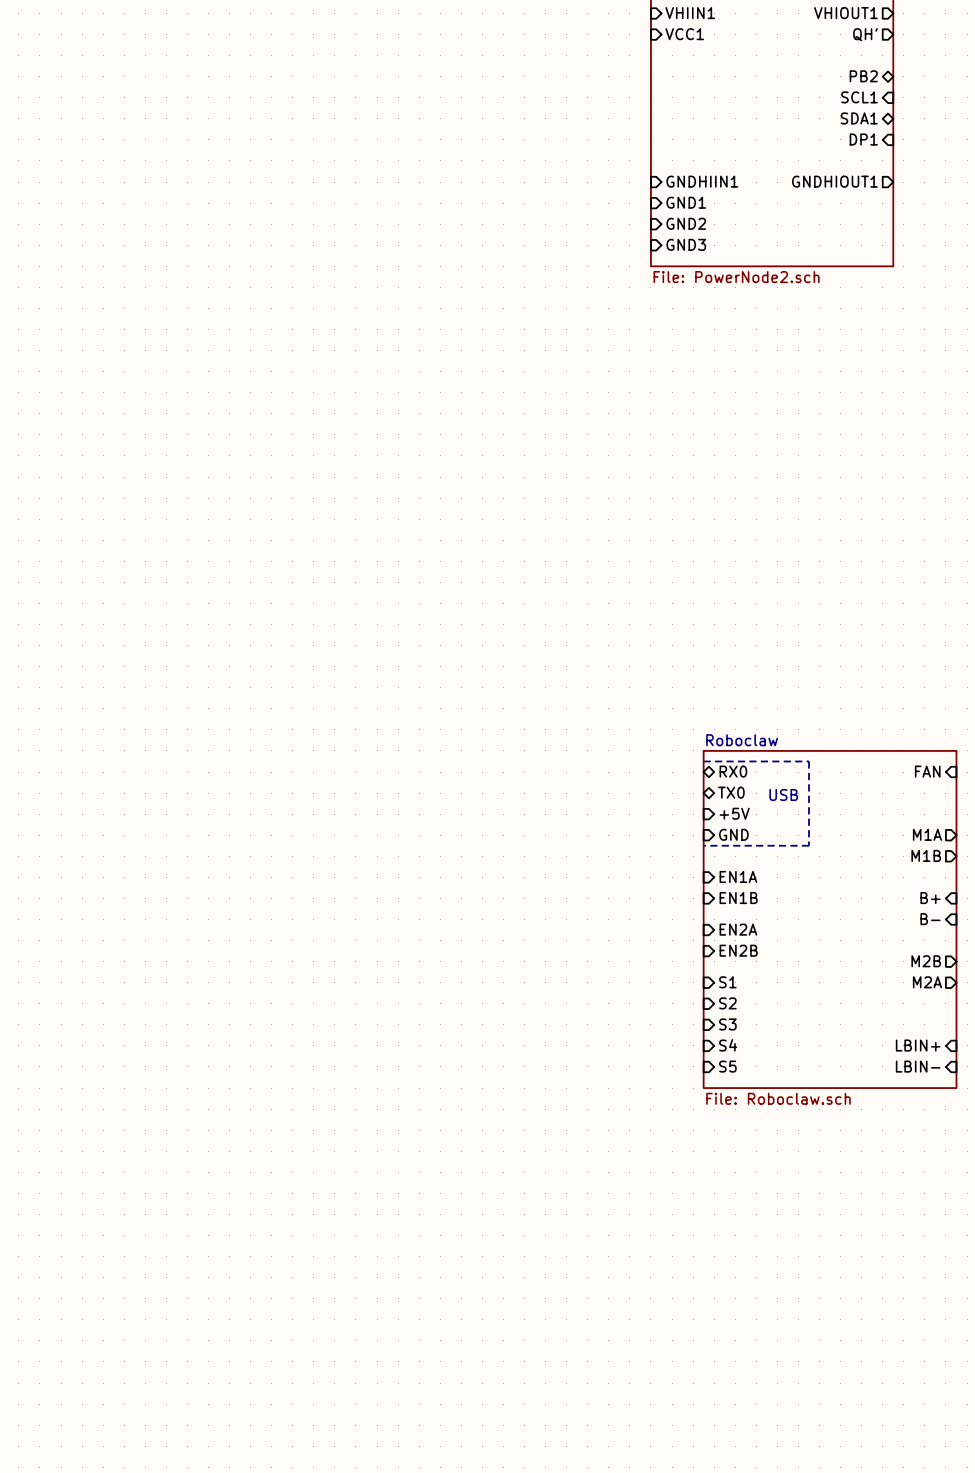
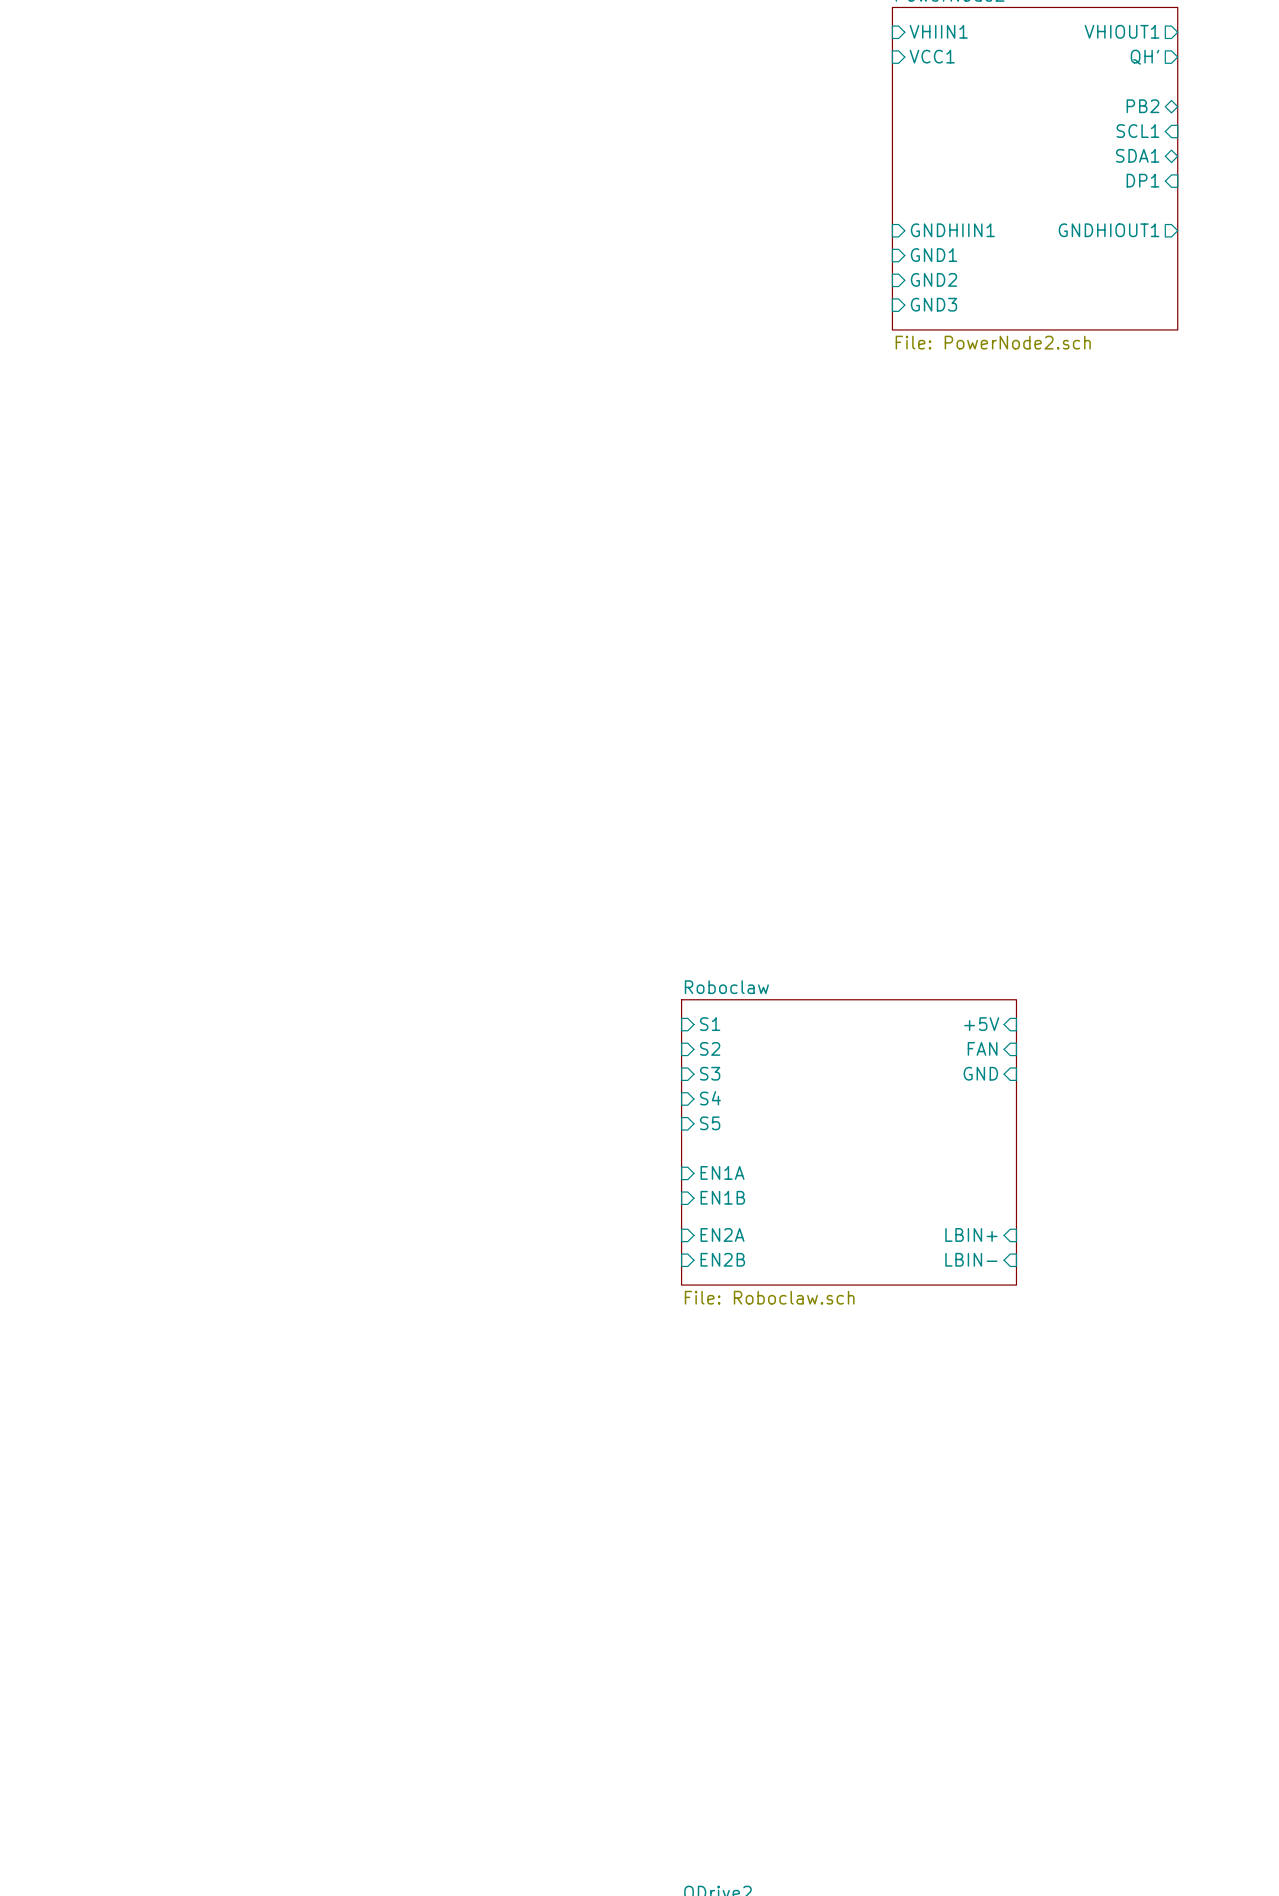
line: (703, 761) (808, 761) (808, 845) (703, 845) -> none
sheet pin: RX0 (733, 771) -> none
sheet pin: FAN (927, 771) -> none
sheet pin: TX0 (731, 792) -> none
text: USB (783, 794) -> none
sheet pin rotation: 0° (734, 813) -> 180° (981, 1024)
sheet pin position: +5V (734, 813) -> +5V (981, 1024)
sheet pin rotation: 0° (733, 834) -> 180° (980, 1073)
sheet pin position: GND (733, 834) -> GND (980, 1073)
sheet pin: M1A (927, 834) -> none
sheet pin: none -> S1 (710, 1024)
sheet pin: M1B (926, 855) -> none
sheet pin: none -> S2 (710, 1048)
sheet pin: none -> FAN (982, 1048)
sheet pin: EN1A (738, 876) -> none
sheet pin: none -> S3 (710, 1073)
sheet pin: EN1B (738, 898) -> none
sheet pin: B+ (930, 898) -> none
sheet pin: none -> S4 (710, 1098)
sheet Roboclaw: File: Roboclaw.sch (830, 919) -> none
sheet pin: B- (930, 919) -> none
sheet pin: EN2A (738, 929) -> none
sheet pin: none -> S5 (710, 1123)
sheet pin: EN2B (738, 950) -> none
sheet Roboclaw: none -> File: Roboclaw.sch (849, 1142)
sheet pin: M2B (926, 961) -> none
sheet pin: none -> EN1A (722, 1172)
sheet pin: S1 (727, 982) -> none
sheet pin: M2A (927, 982) -> none
sheet pin: none -> EN1B (722, 1197)
sheet pin: S2 (727, 1003) -> none
sheet pin: S3 (727, 1024) -> none
sheet pin: none -> EN2A (722, 1234)
sheet pin: S4 (728, 1045) -> none
sheet pin position: LBIN+ (918, 1045) -> LBIN+ (971, 1234)
sheet pin: none -> EN2B (722, 1259)
sheet pin: S5 (727, 1066) -> none
sheet pin position: LBIN- (918, 1066) -> LBIN- (971, 1259)

